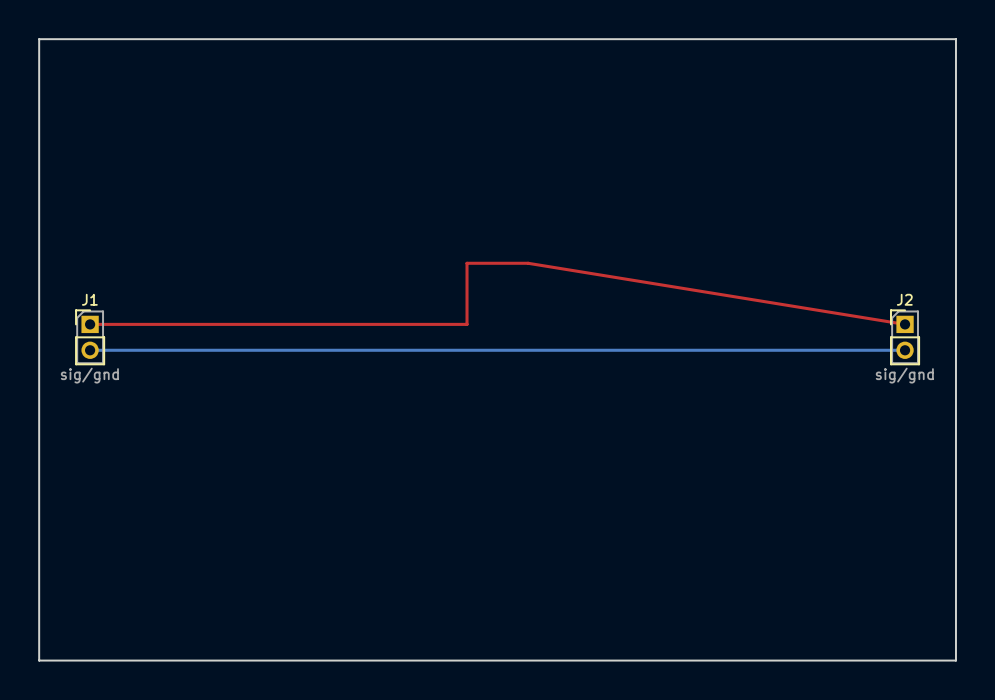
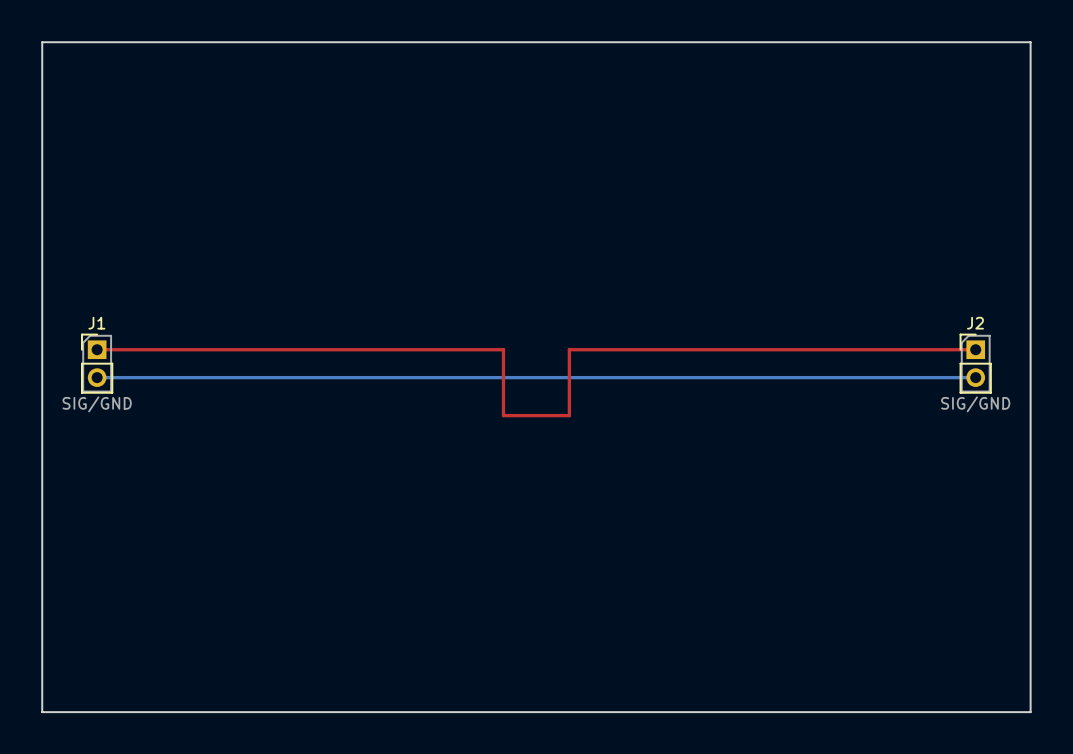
top track: (467, 324) (467, 263) (528, 263) (905, 324) -> (503, 349) (503, 415) (569, 415) (569, 349) (975, 349)
J1 value: sig/gnd (89, 375) -> SIG/GND (97, 404)
J2 value: sig/gnd (904, 375) -> SIG/GND (975, 404)

